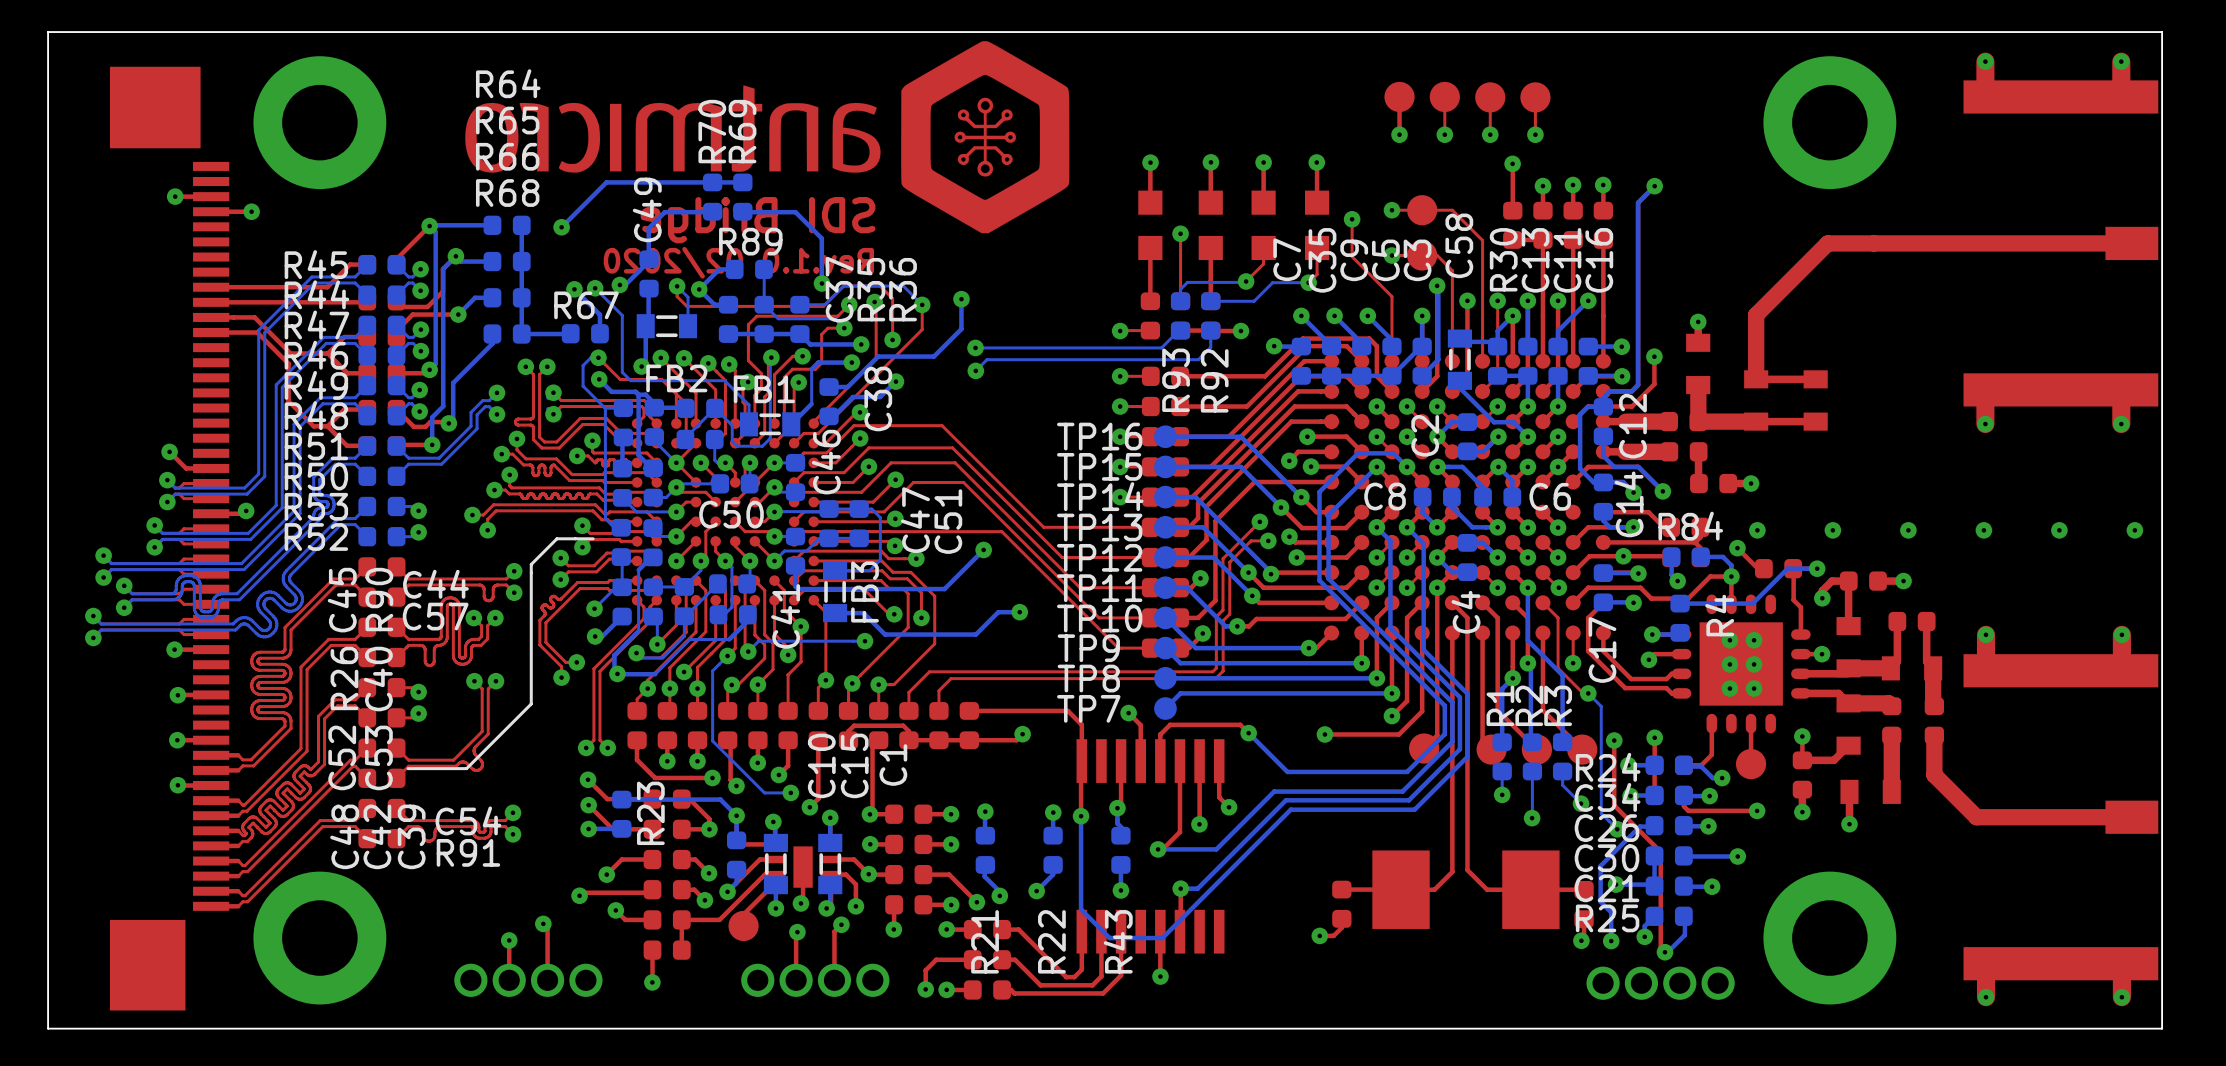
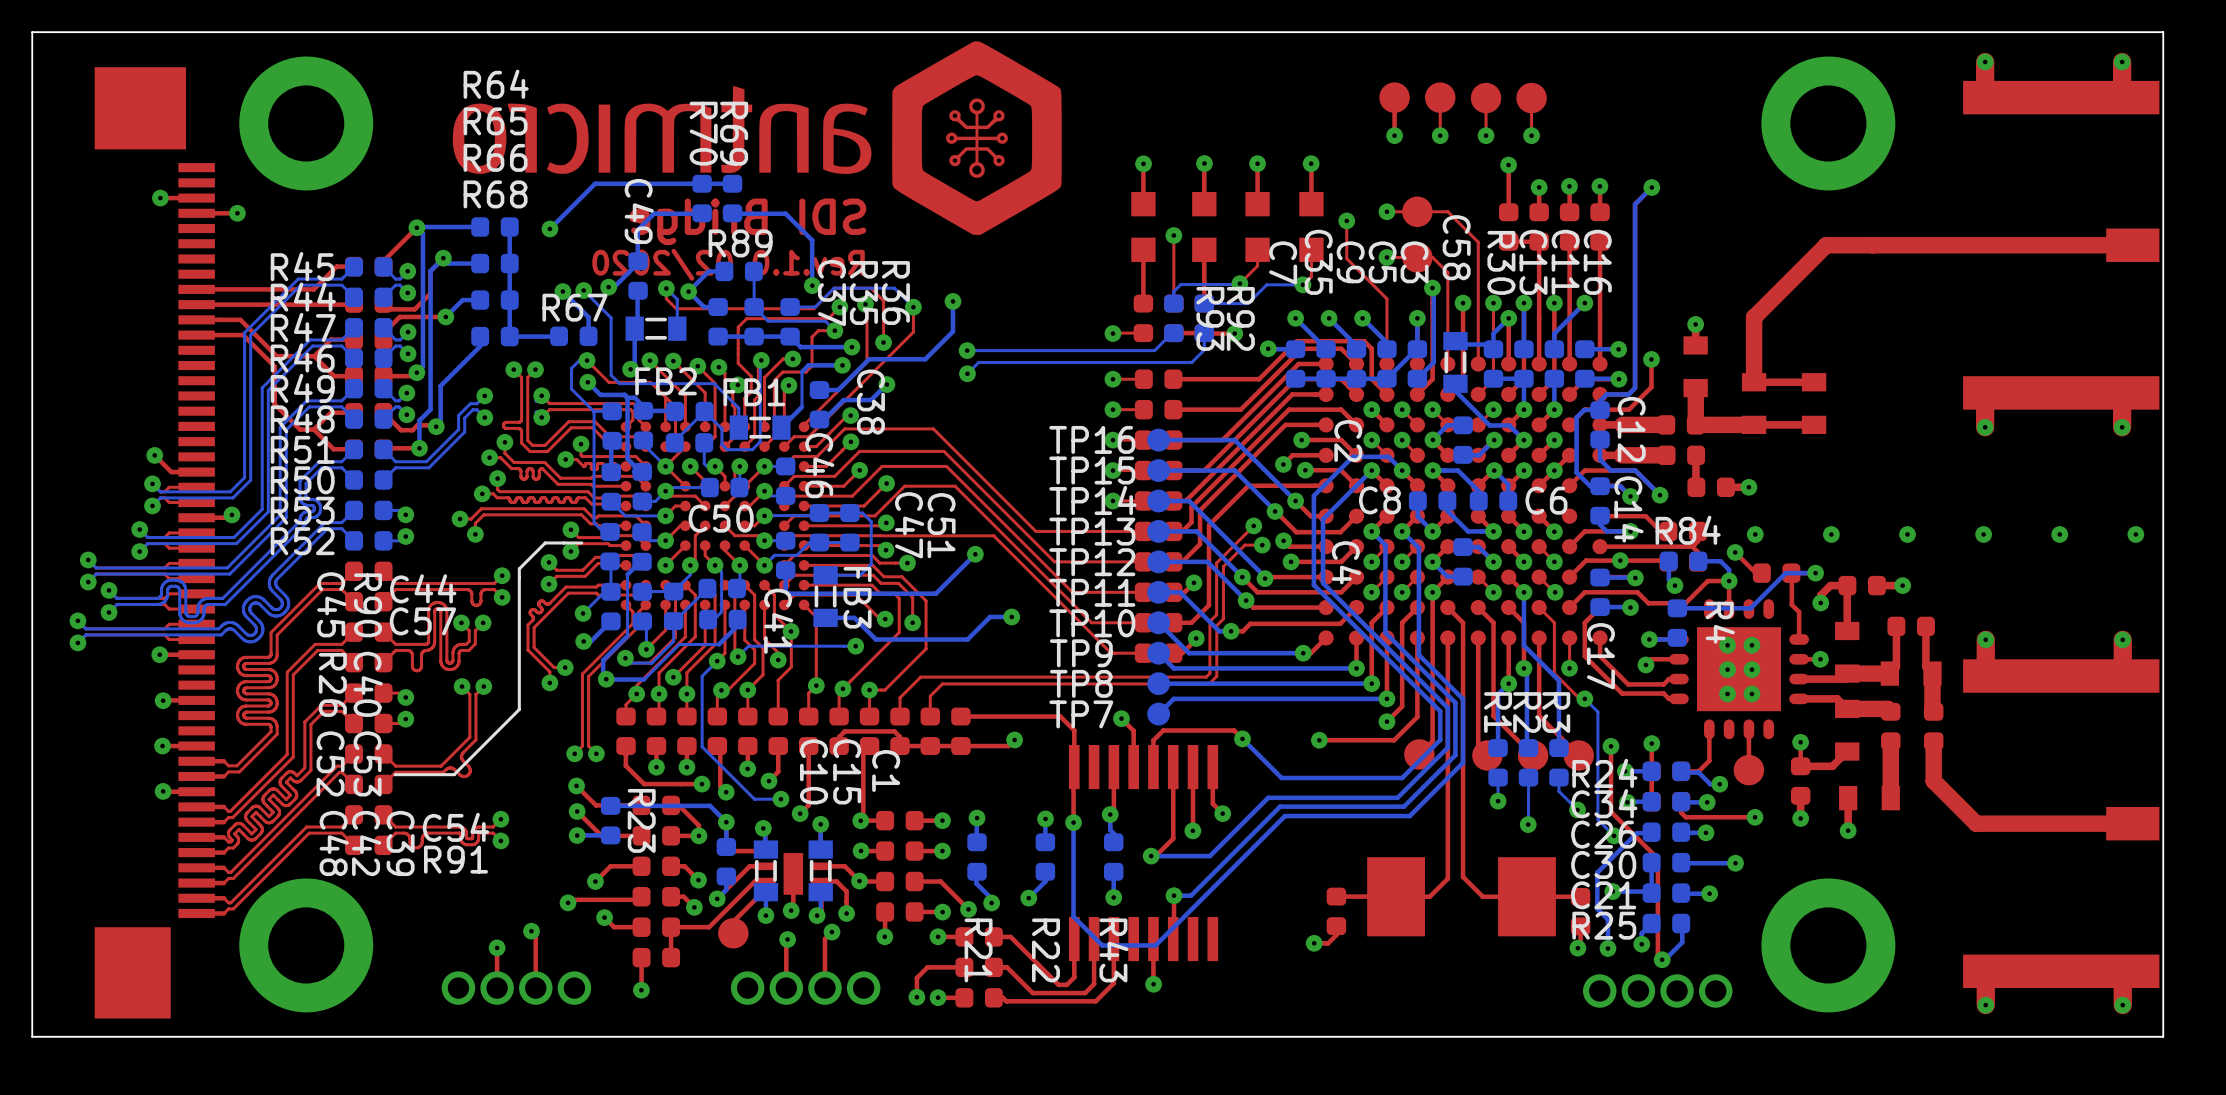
R70 name rotation: 0° (712, 131) -> 180° (703, 133)
R69 name rotation: 0° (742, 131) -> 180° (734, 133)
C49 name rotation: 0° (647, 209) -> 180° (639, 211)
C58 name rotation: 0° (1459, 245) -> 180° (1456, 247)
C7 name rotation: 0° (1287, 259) -> 180° (1283, 262)
R30 name rotation: 0° (1503, 259) -> 180° (1501, 262)
C35 name rotation: 0° (1322, 260) -> 180° (1318, 262)
C9 name rotation: 0° (1354, 260) -> 180° (1350, 262)
C5 name rotation: 0° (1385, 260) -> 180° (1382, 262)
C3 name rotation: 0° (1417, 260) -> 180° (1414, 262)
C13 name rotation: 0° (1535, 260) -> 180° (1533, 262)
C11 name rotation: 0° (1567, 260) -> 180° (1565, 262)
C16 name rotation: 0° (1599, 260) -> 180° (1597, 262)
C37 name rotation: 0° (839, 289) -> 180° (831, 293)
R35 name rotation: 0° (871, 289) -> 180° (863, 293)
R36 name rotation: 0° (903, 289) -> 180° (895, 293)
R93 name rotation: 0° (1176, 380) -> 180° (1210, 318)
R92 name rotation: 0° (1214, 380) -> 180° (1240, 318)
C38 name rotation: 0° (878, 398) -> 180° (870, 402)
C12 name rotation: 0° (1632, 426) -> 180° (1631, 429)
C2 name rotation: 0° (1425, 435) -> 180° (1348, 441)
C2 name position: C2 (1425, 435) -> C2 (1348, 441)
C46 name rotation: 0° (826, 462) -> 180° (819, 465)
C14 name rotation: 0° (1629, 504) -> 180° (1628, 509)
C47 name rotation: 0° (915, 520) -> 180° (909, 525)
C51 name rotation: 0° (948, 521) -> 180° (941, 525)
FB3 name rotation: 0° (864, 591) -> 180° (857, 597)
R90 name rotation: 0° (379, 599) -> 180° (368, 605)
C45 name rotation: 0° (342, 600) -> 180° (331, 604)
C4 name rotation: 0° (1465, 612) -> 180° (1346, 562)
C4 name position: C4 (1465, 612) -> C4 (1346, 562)
R4 name rotation: 0° (1719, 615) -> 180° (1720, 622)
C41 name rotation: 0° (785, 616) -> 180° (778, 621)
C17 name rotation: 0° (1602, 649) -> 180° (1600, 656)
R26 name rotation: 0° (344, 678) -> 180° (332, 684)
C40 name rotation: 0° (378, 679) -> 180° (368, 684)
R1 name rotation: 0° (1500, 705) -> 180° (1498, 712)
R2 name rotation: 0° (1529, 705) -> 180° (1527, 712)
R3 name rotation: 0° (1558, 705) -> 180° (1556, 712)
C52 name rotation: 0° (342, 757) -> 180° (330, 763)
C53 name rotation: 0° (378, 757) -> 180° (367, 763)
C1 name rotation: 0° (893, 764) -> 180° (886, 771)
C10 name rotation: 0° (821, 765) -> 180° (814, 771)
C15 name rotation: 0° (854, 765) -> 180° (847, 771)
R23 name rotation: 0° (650, 813) -> 180° (641, 820)
C48 name rotation: 0° (344, 836) -> 180° (334, 843)
C42 name rotation: 0° (376, 836) -> 180° (366, 843)
C39 name rotation: 0° (411, 836) -> 180° (400, 843)
R21 name rotation: 0° (985, 941) -> 180° (978, 950)
R22 name rotation: 0° (1051, 941) -> 180° (1045, 950)
R43 name rotation: 0° (1118, 941) -> 180° (1114, 950)

